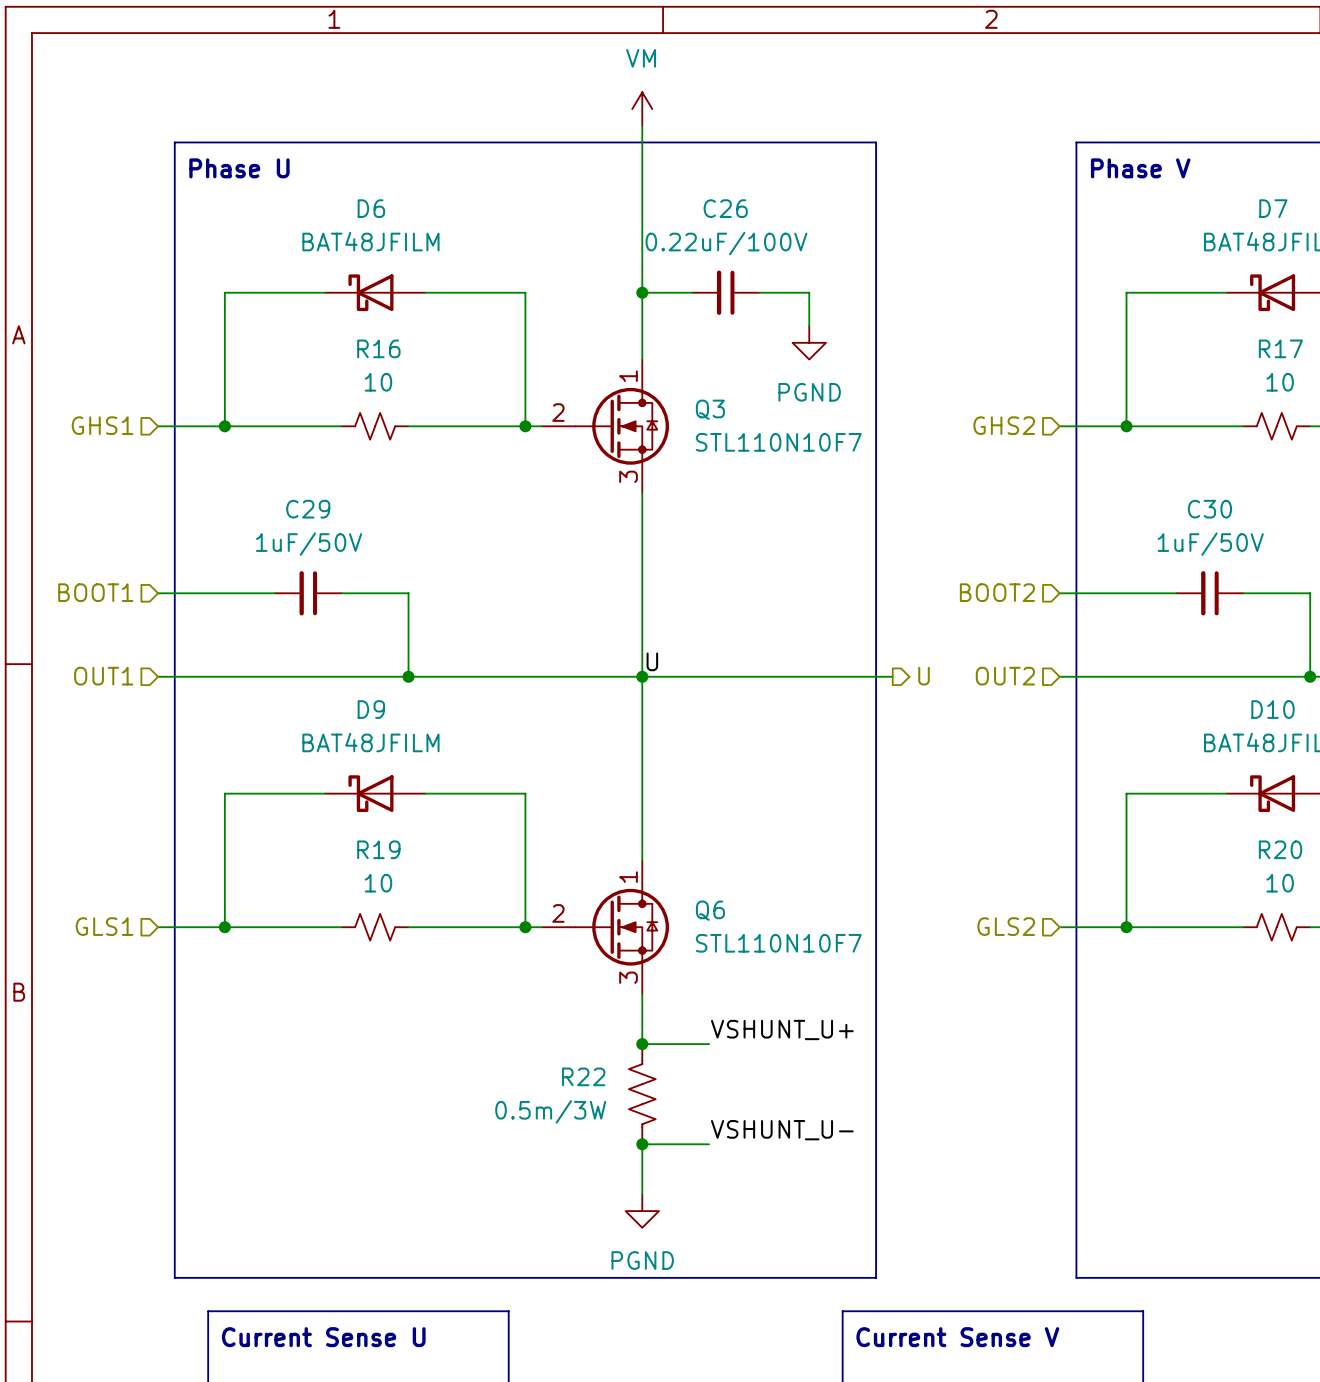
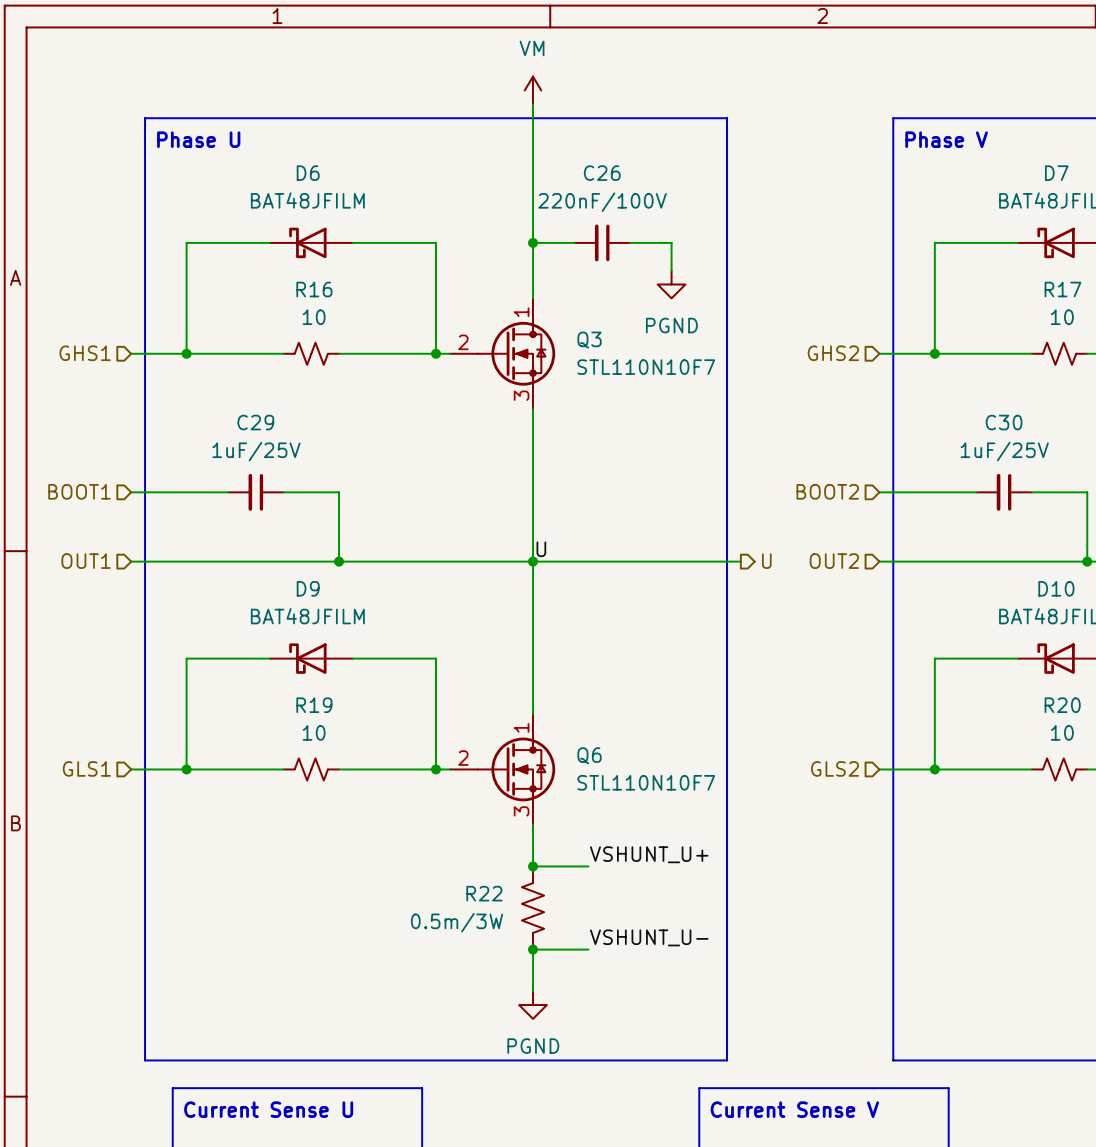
C26 value: 0.22uF/100V (726, 243) -> 220nF/100V (602, 202)
C29 value: 1uF/50V (309, 544) -> 1uF/25V (256, 451)
C30 value: 1uF/50V (1210, 544) -> 1uF/25V (1004, 451)

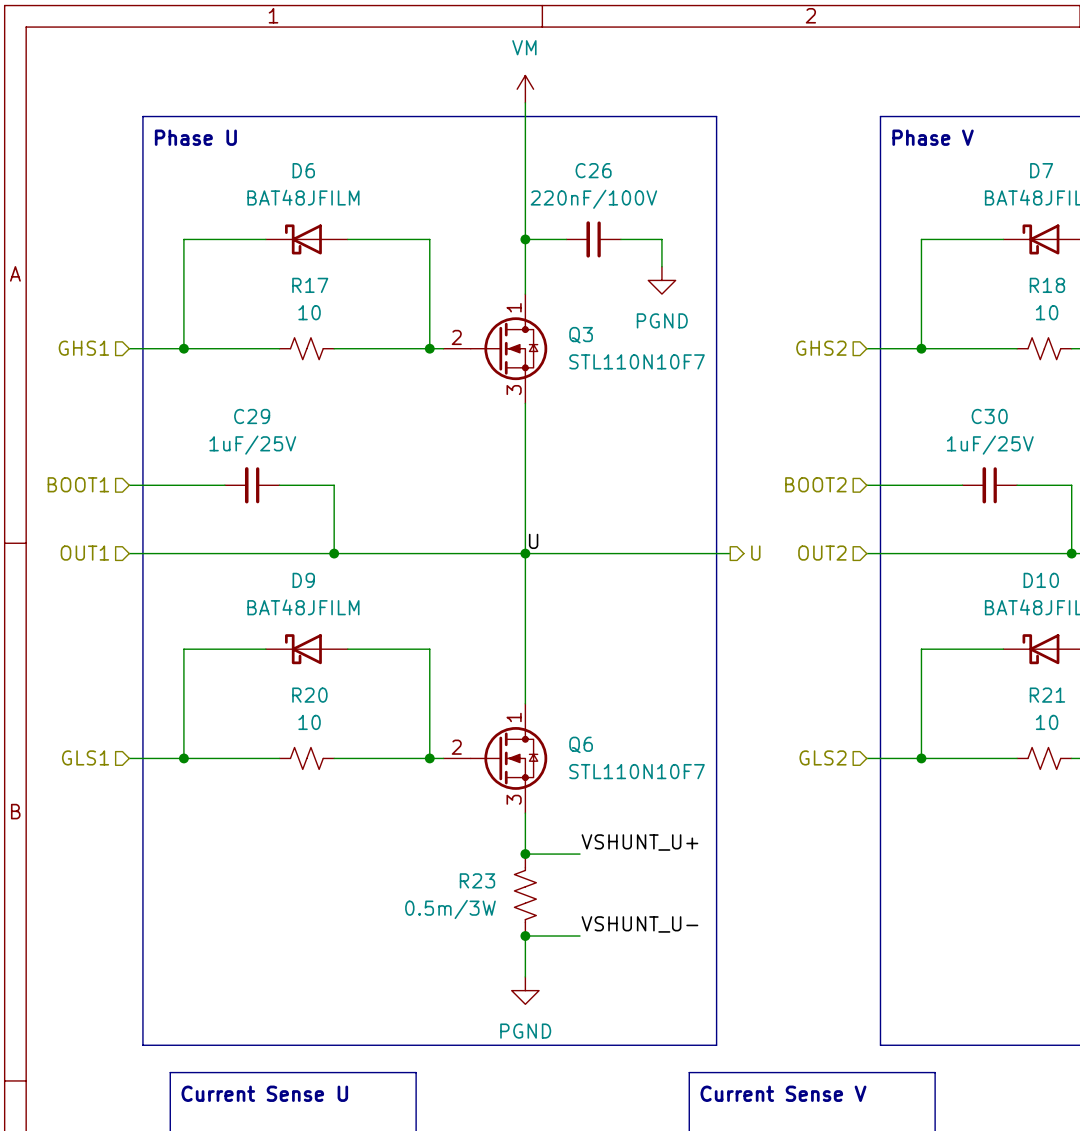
R16 name: R16 (314, 289) -> R17 (310, 285)
R17 name: R17 (1062, 289) -> R18 (1047, 285)
R19 name: R19 (314, 705) -> R20 (309, 695)
R20 name: R20 (1062, 705) -> R21 (1047, 695)
R22 name: R22 (484, 893) -> R23 (477, 880)

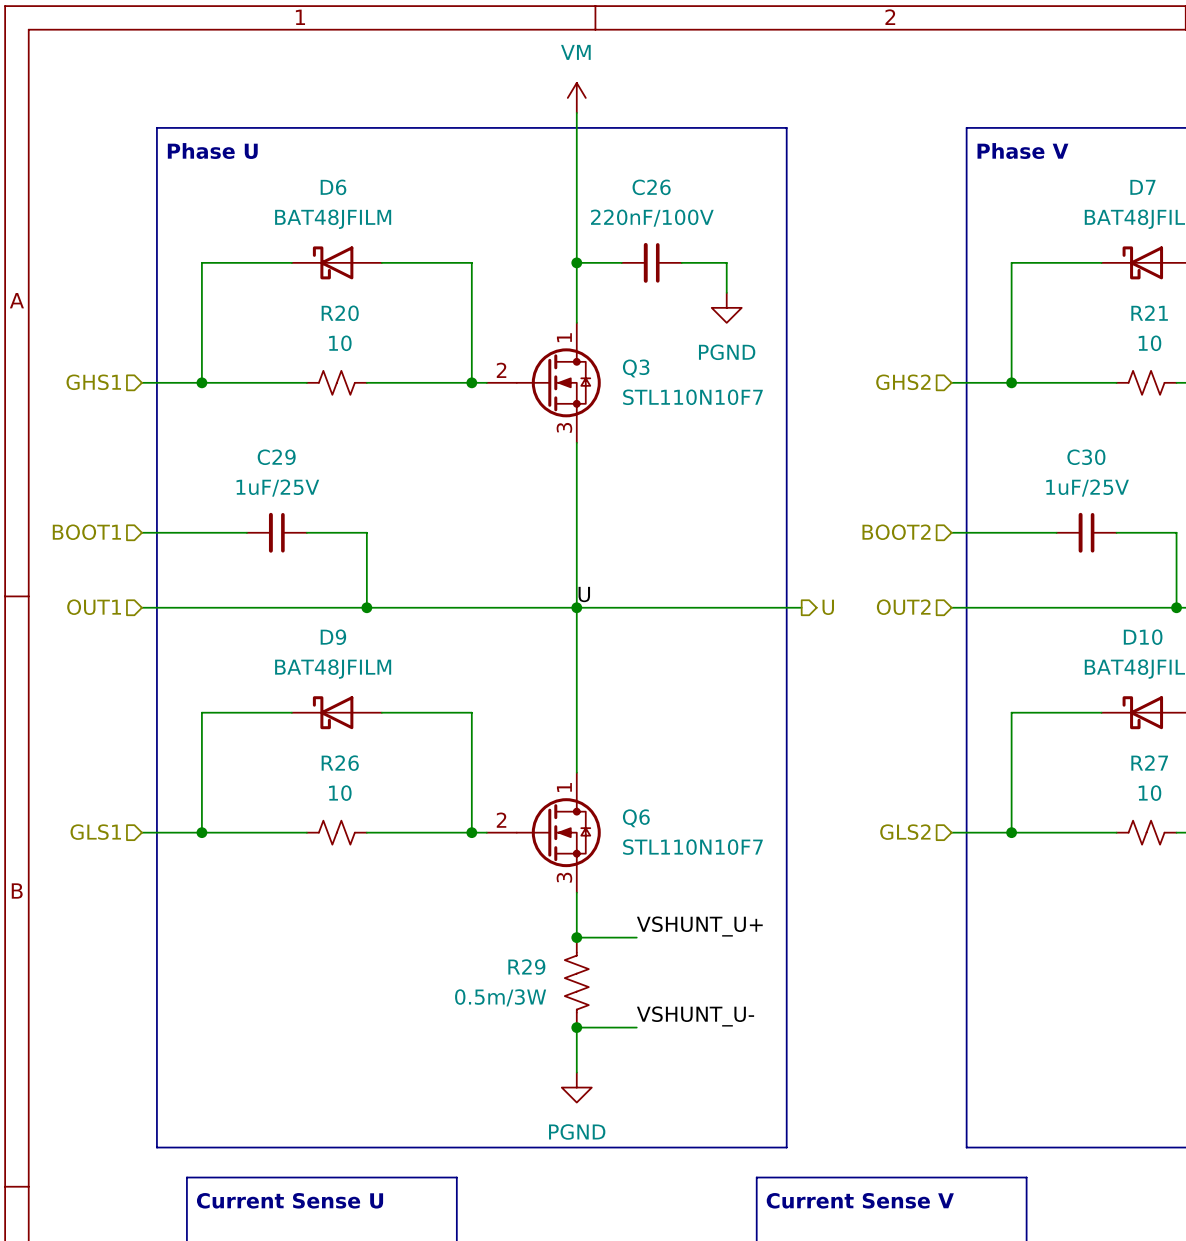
R17 name: R17 (310, 285) -> R20 (340, 313)
R18 name: R18 (1047, 285) -> R21 (1149, 313)
R20 name: R20 (309, 695) -> R26 (340, 763)
R21 name: R21 (1047, 695) -> R27 (1149, 762)
R23 name: R23 (477, 880) -> R29 (526, 967)

